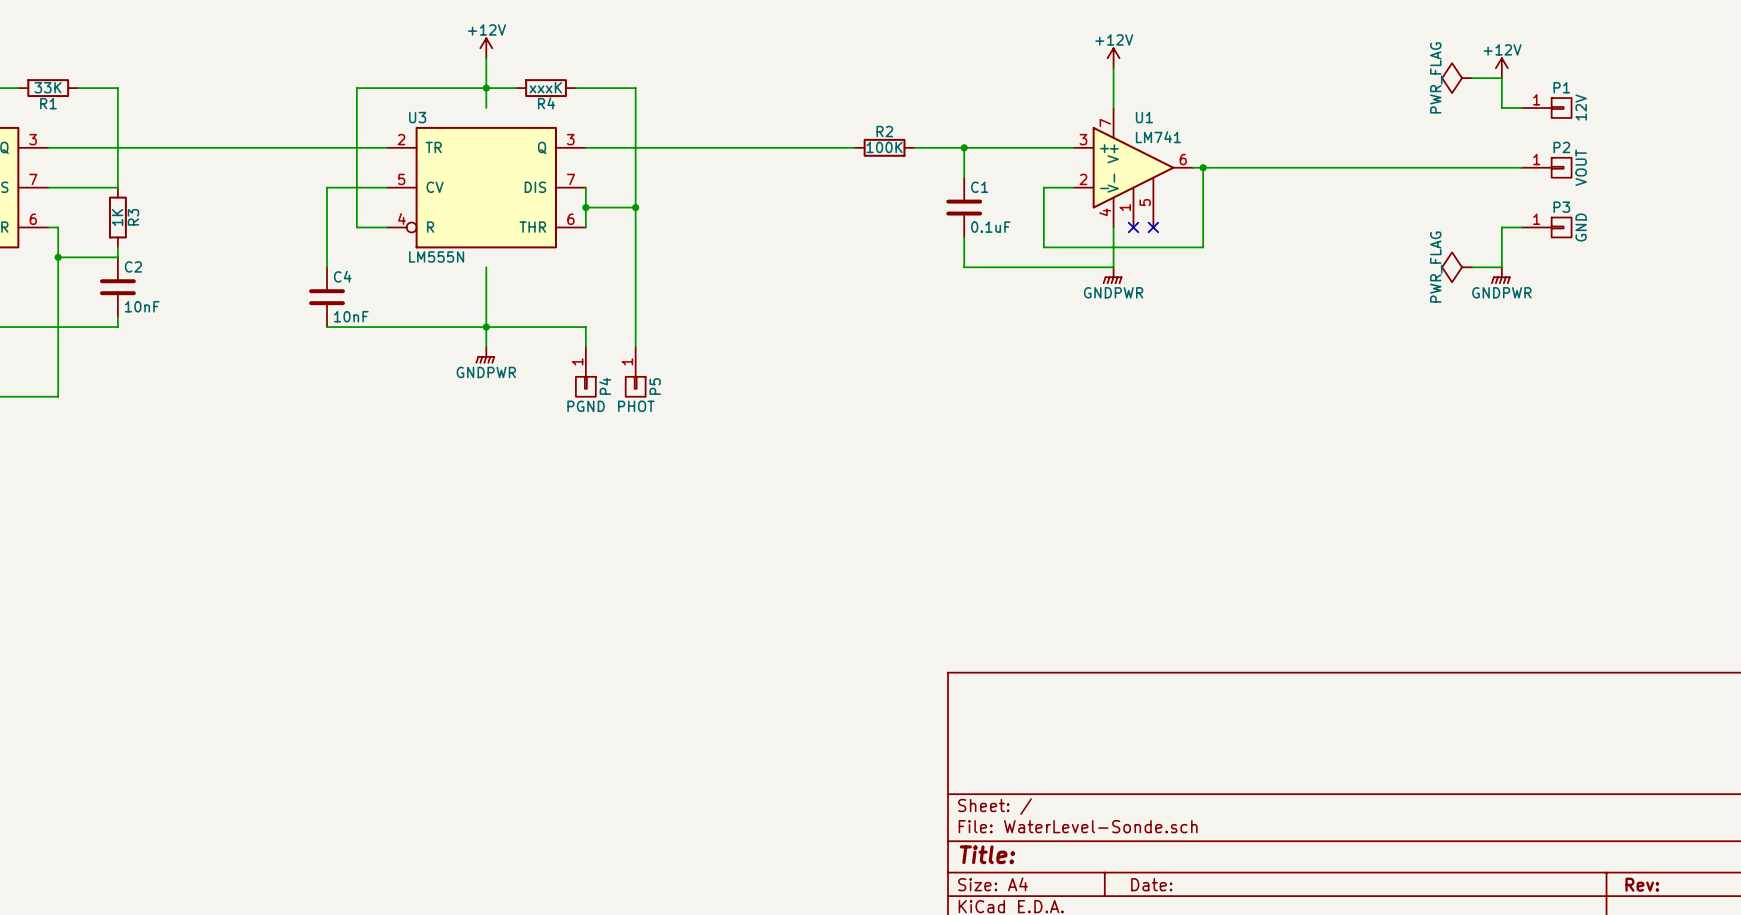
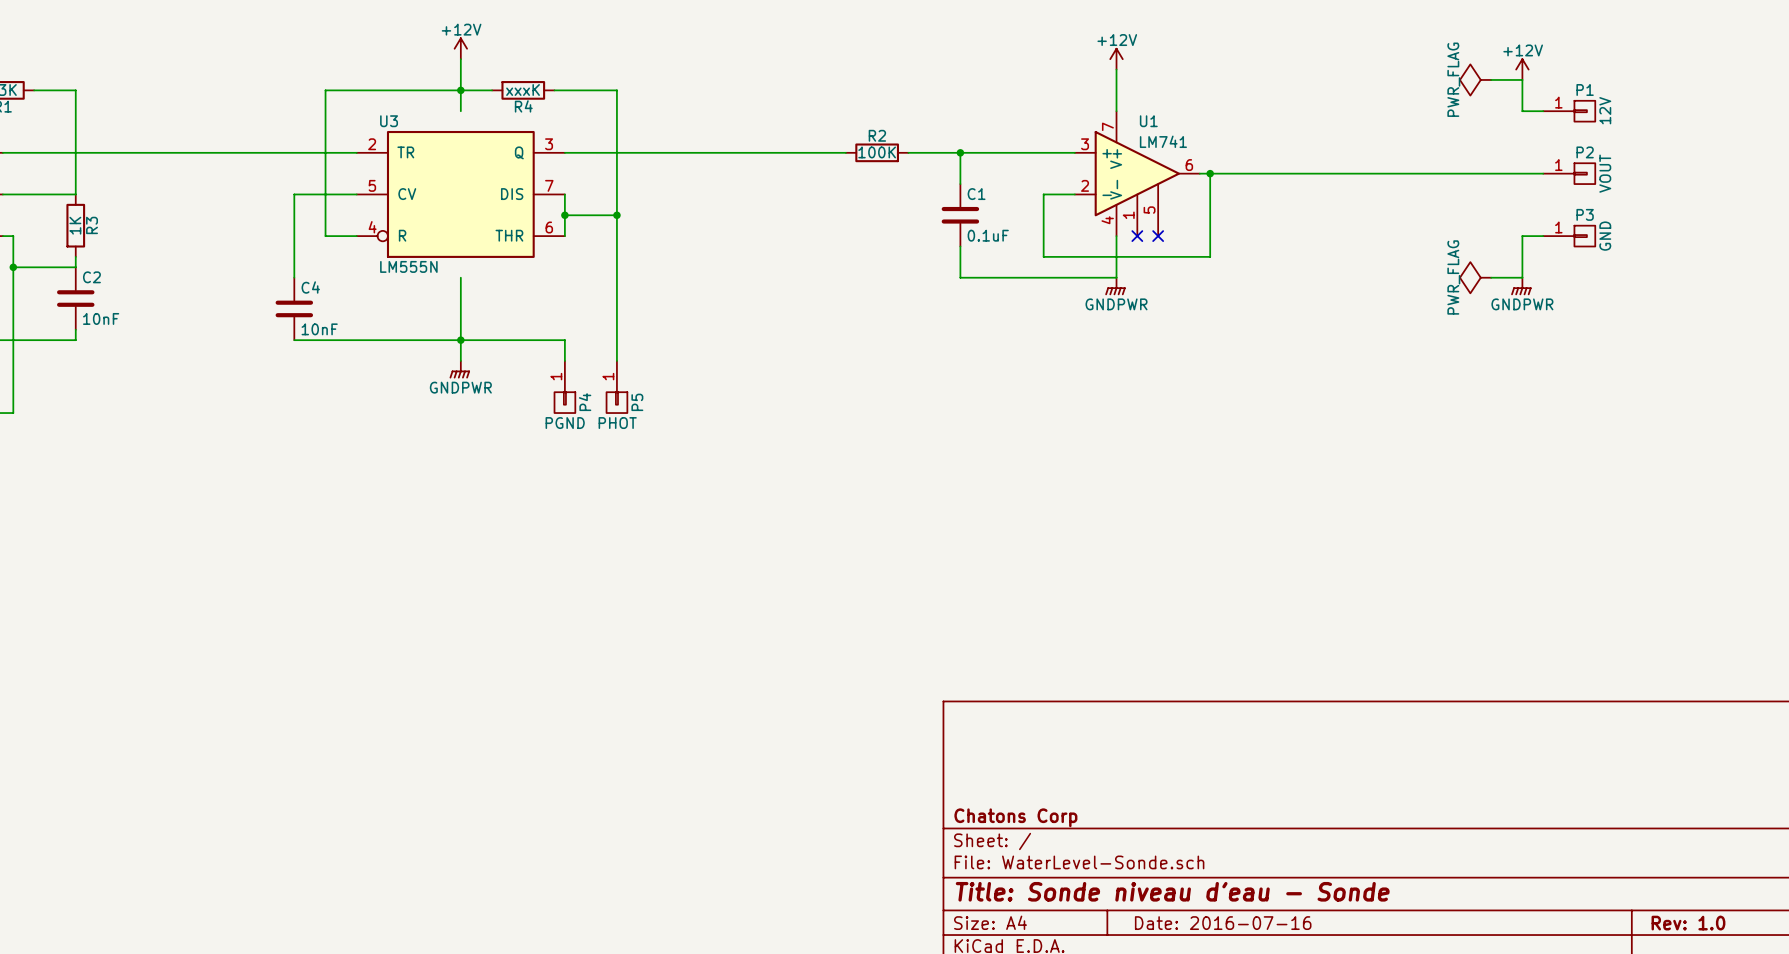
title block: none -> Chatons Corp (1015, 817)
title block: Title: (987, 854) -> Title: Sonde niveau d'eau - Sonde (1172, 891)
title block: Date: (1151, 884) -> Date: 2016-07-16 (1223, 923)
title block: Rev: (1642, 884) -> Rev: 1.0 (1688, 923)

